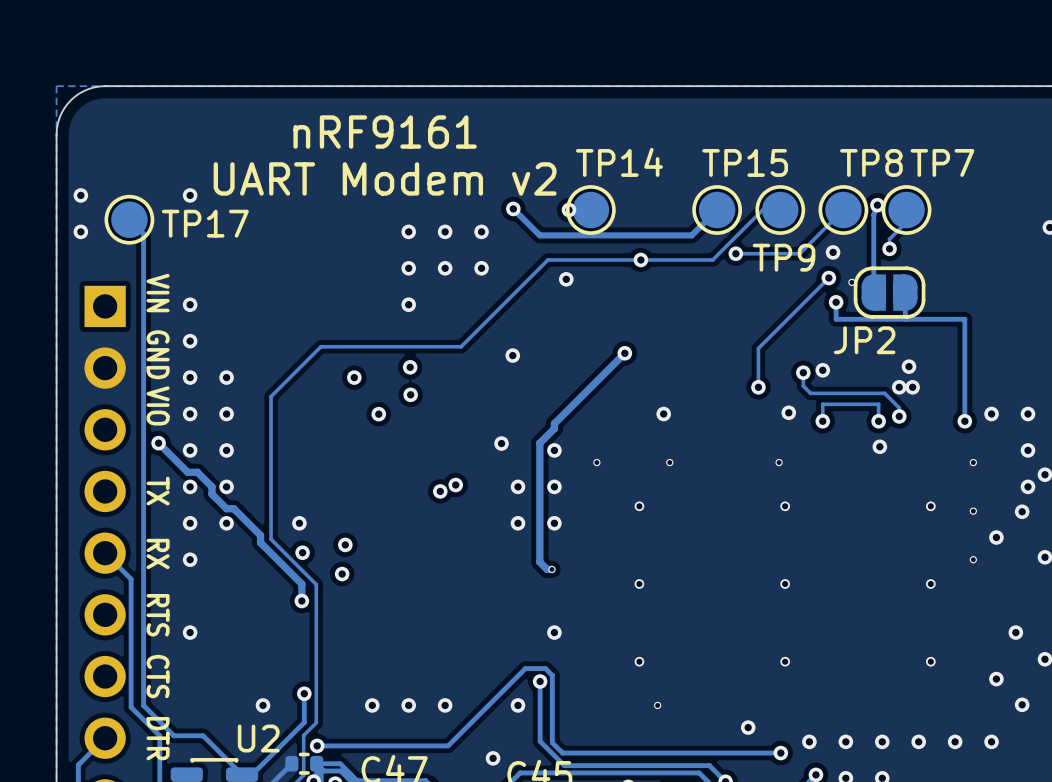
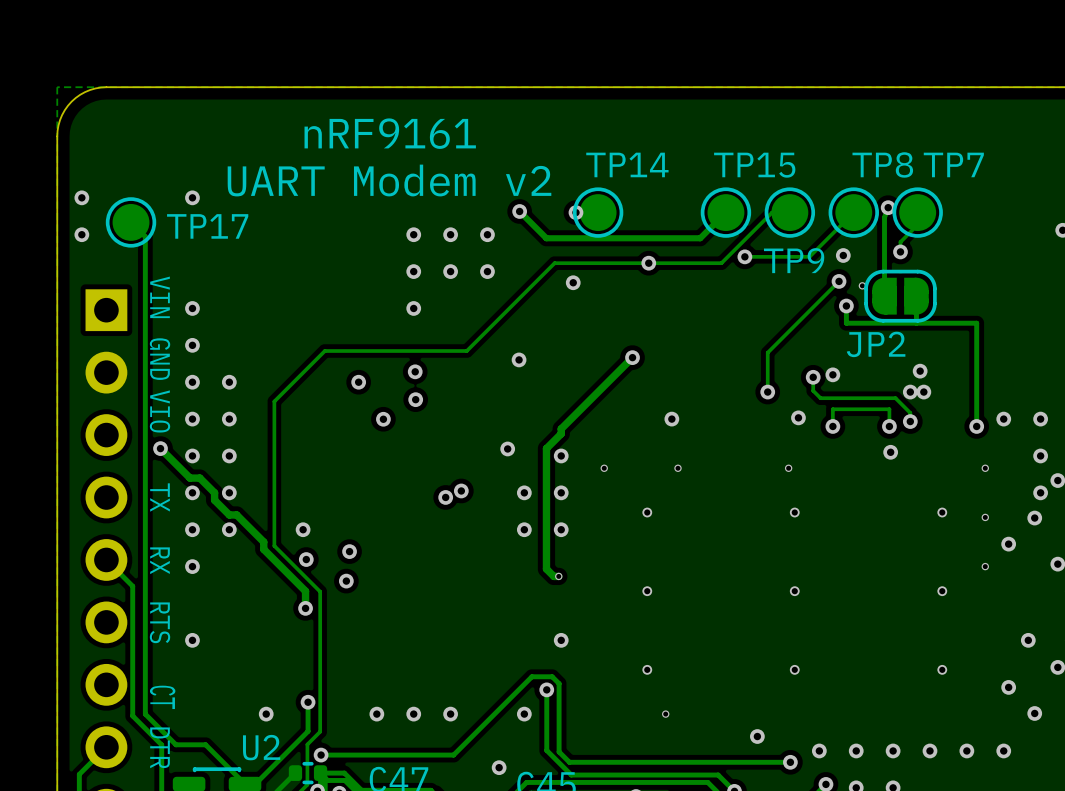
text: CTS (158, 676) -> CT (162, 697)

